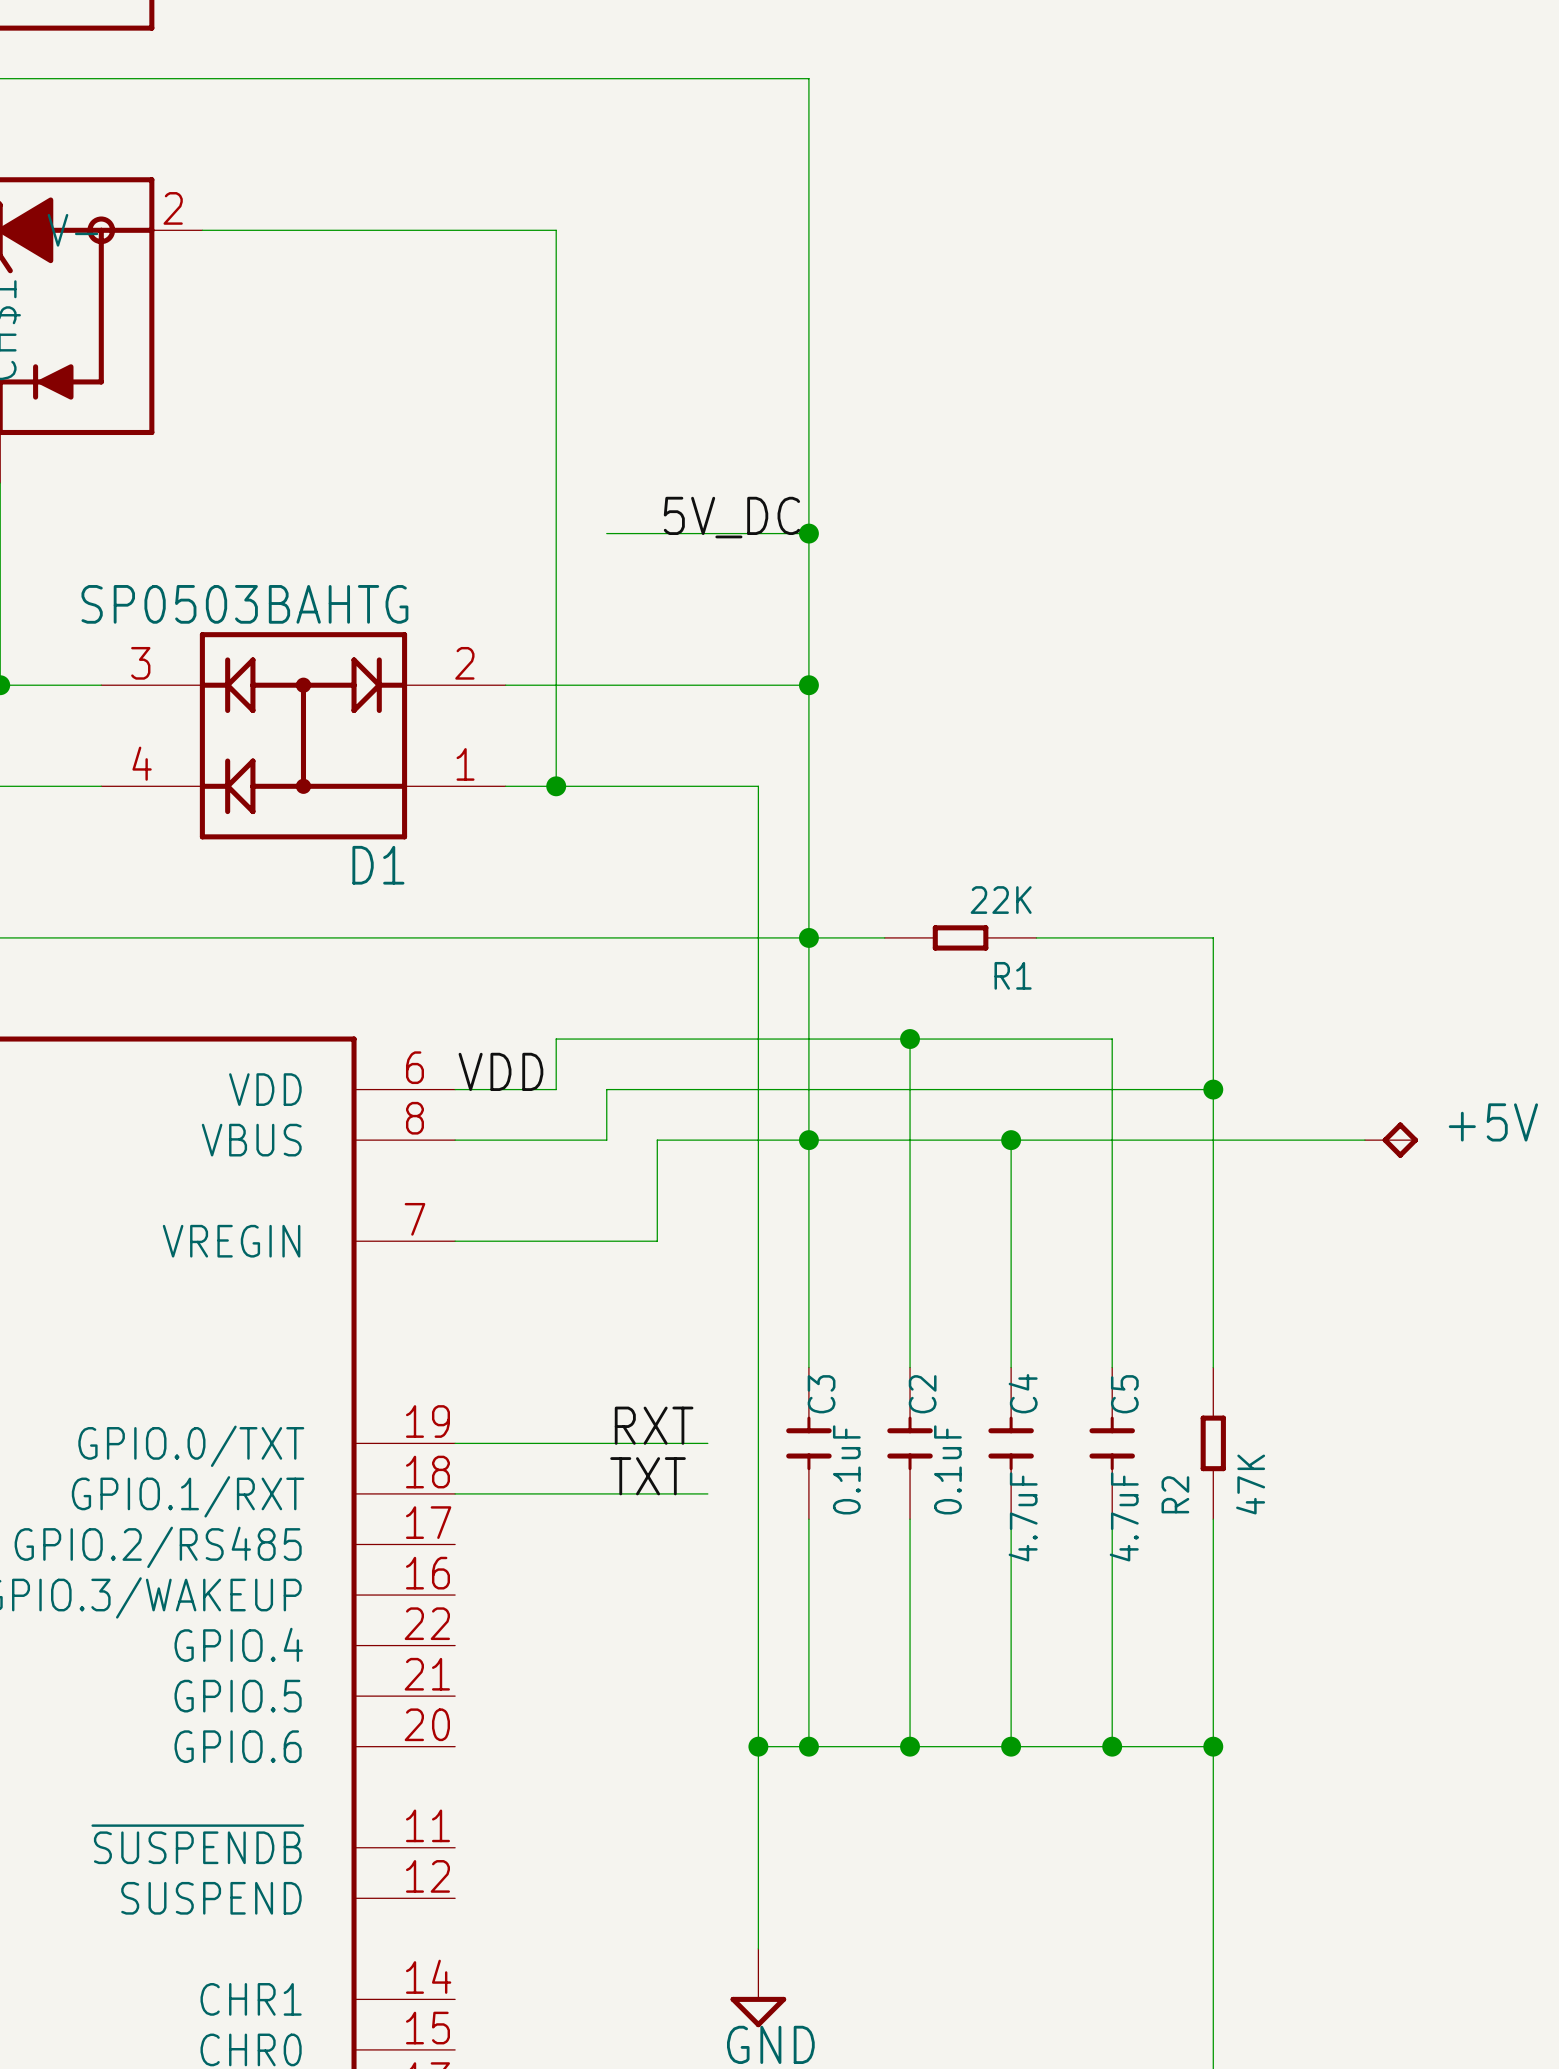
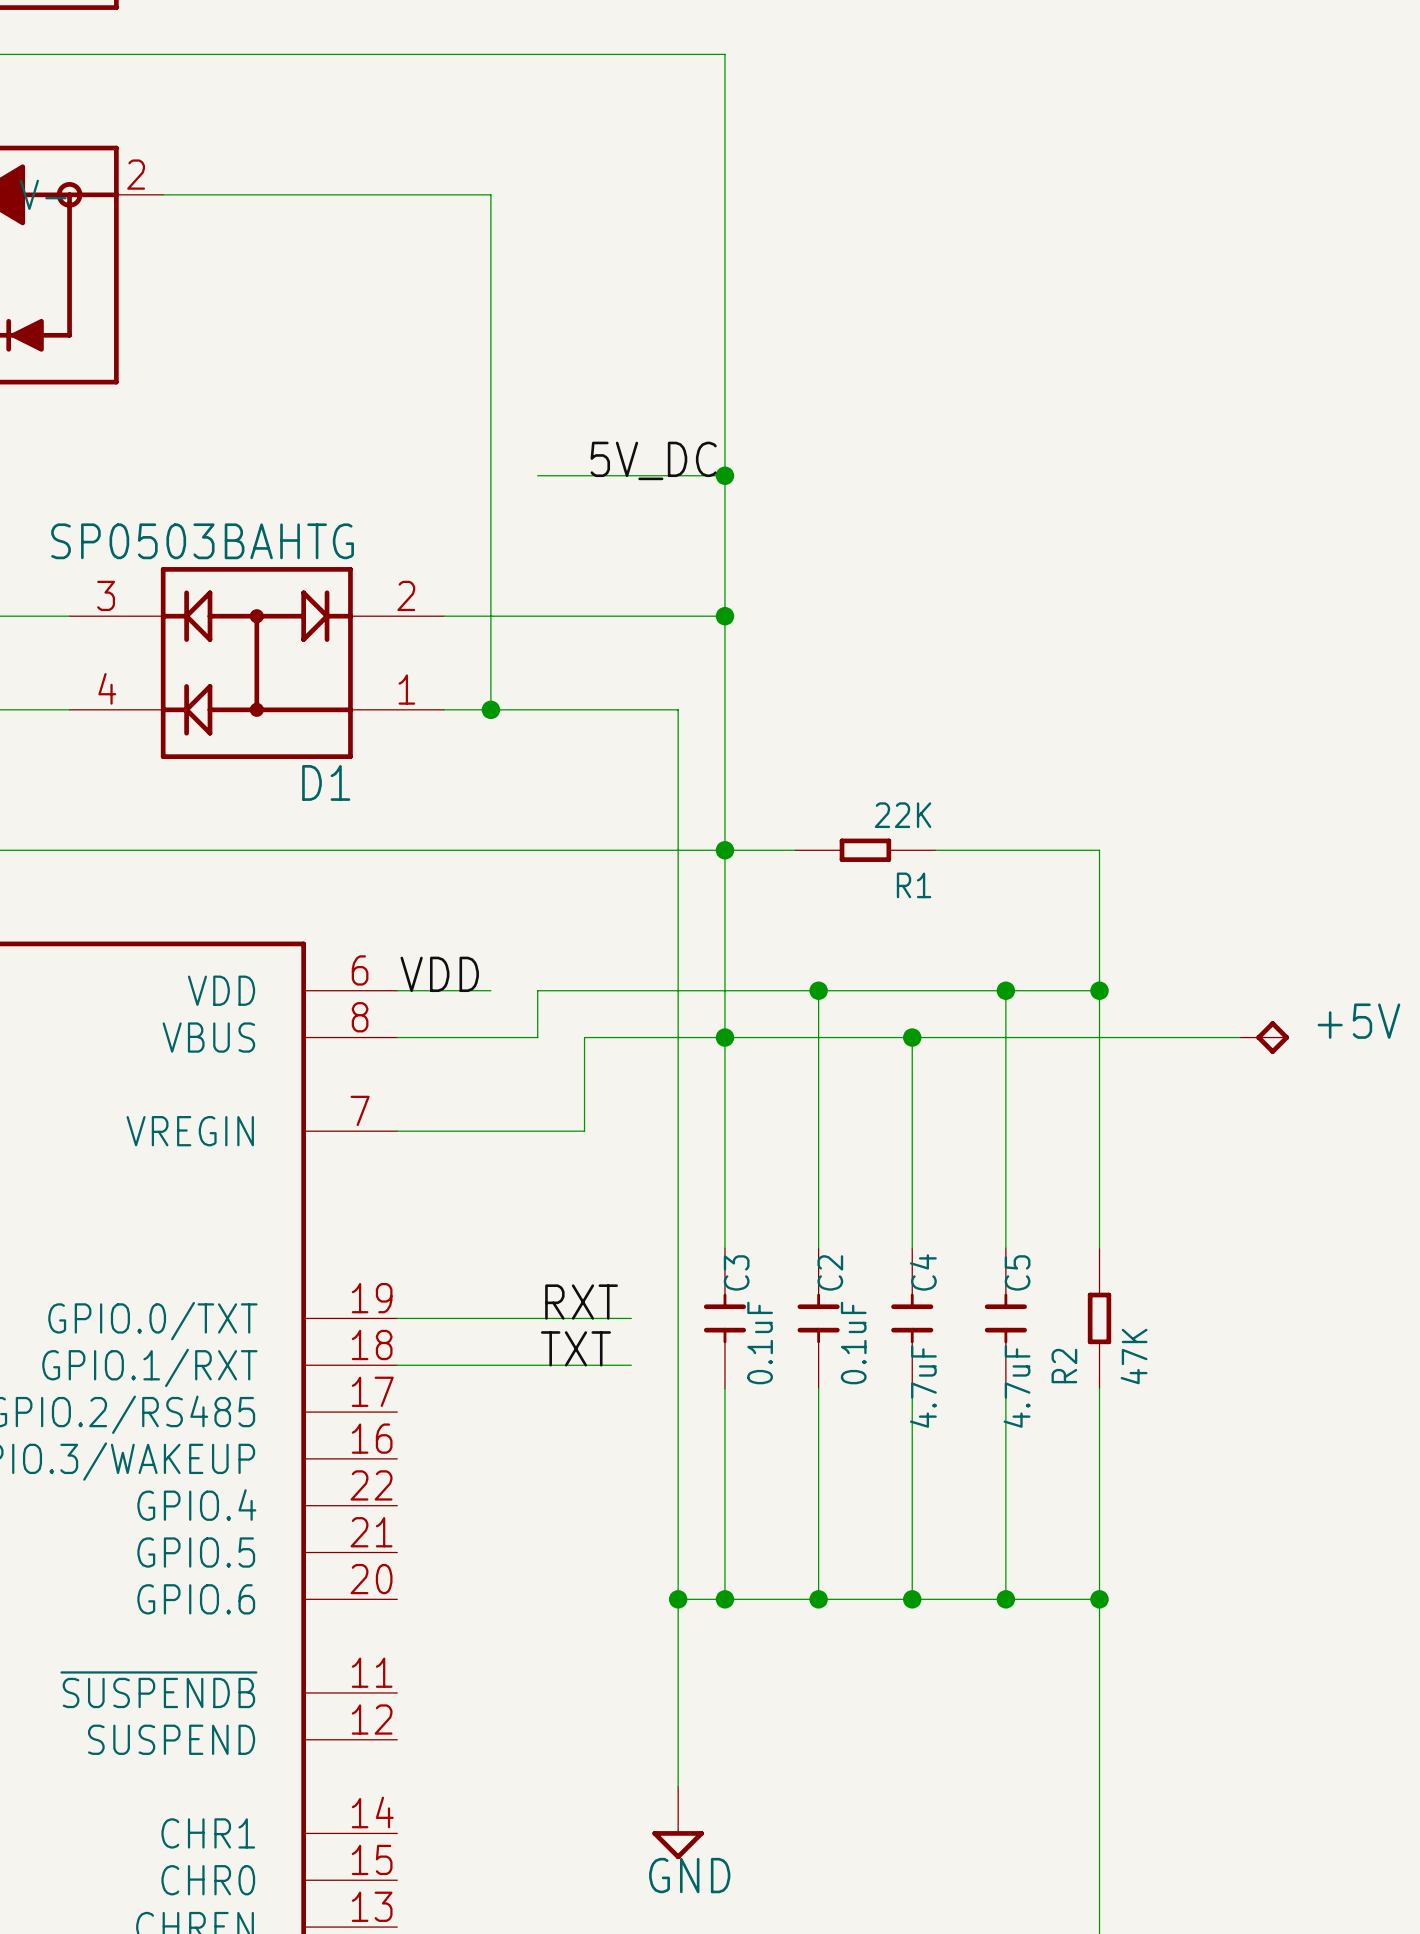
wire: (910, 1039) (910, 1089) -> none
junction position: (910, 1039) -> (818, 990)
wire: (556, 1089) (556, 1039) (1112, 1039) (1112, 1089) -> none
junction: none -> (1005, 990)

